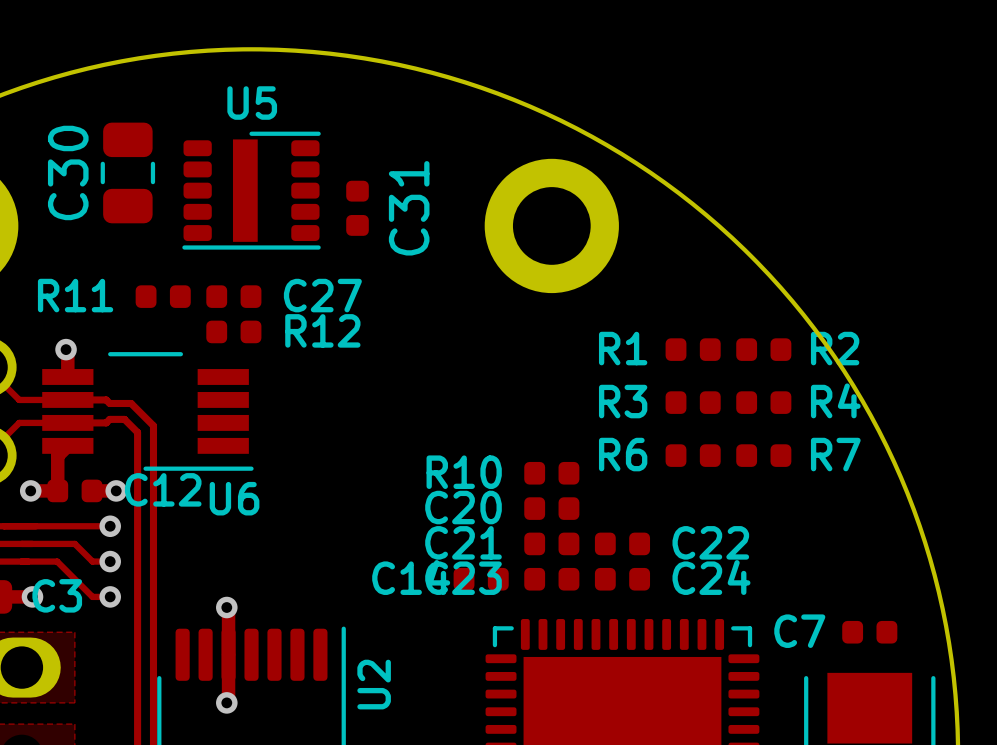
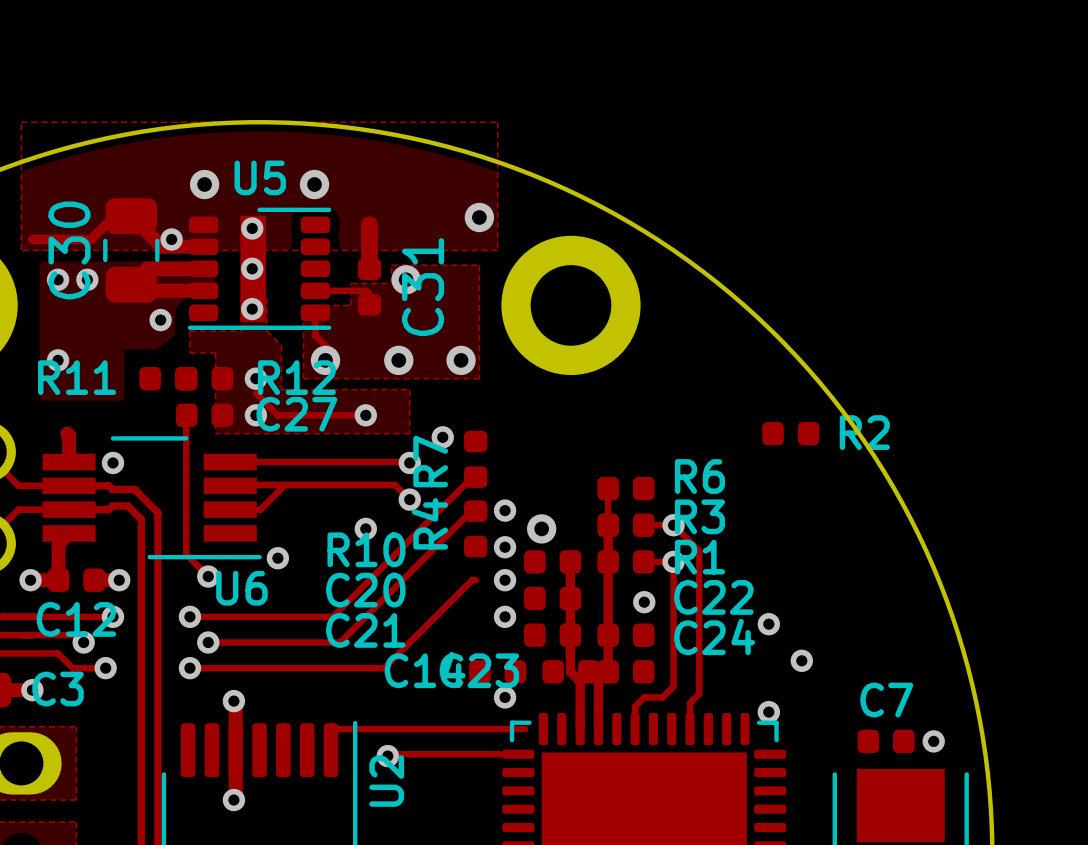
zone outline: none -> (21, 122) (21, 250) (497, 250) (497, 122) (21, 122)
via: none -> (204, 184)
via: none -> (314, 184)
via: none -> (479, 217)
track: none -> (369, 224) (369, 258)
via: none -> (252, 228)
track: none -> (32, 239) (91, 239) (114, 216) (131, 216) (162, 246) (203, 246)
via: none -> (171, 239)
zone outline: none -> (391, 265) (391, 283) (351, 283) (351, 305) (303, 305) (303, 378) (479, 378) (479, 265) (391, 265)
track: none -> (203, 268) (147, 268) (131, 284) (137, 290) (203, 290)
via: none -> (252, 268)
via: none -> (58, 279)
via: none -> (87, 279)
via: none -> (406, 279)
track: none -> (315, 290) (366, 290) (369, 293)
zone outline: none -> (241, 298) (241, 331) (189, 331) (189, 353) (215, 353) (215, 433) (409, 433) (409, 389) (281, 389) (281, 345) (266, 331) (266, 298) (241, 298)
via: none -> (252, 309)
track: none -> (315, 312) (315, 335) (329, 349)
via: none -> (160, 320)
via: none -> (58, 360)
via: none -> (325, 360)
via: none -> (398, 360)
via: none -> (461, 360)
C27 position: (233, 296) -> (204, 415)
via: none -> (255, 378)
track: none -> (255, 393) (277, 415) (365, 415)
track: none -> (186, 415) (186, 554) (208, 576)
R12 position: (233, 331) -> (204, 378)
via: none -> (255, 415)
via: none -> (365, 415)
R1 name position: R1 (623, 348) -> R1 (699, 557)
via: (66, 349) -> none
R1 position: (693, 349) -> (625, 561)
via: none -> (442, 437)
track: none -> (230, 462) (409, 462)
via: none -> (113, 462)
via: none -> (409, 462)
track: none -> (475, 477) (472, 477) (332, 616) (189, 616)
track: none -> (230, 485) (395, 484) (409, 499)
track: none -> (285, 484) (260, 509) (230, 509)
R4 name position: R4 (835, 400) -> R4 (429, 523)
R3 name position: R3 (623, 401) -> R3 (699, 516)
track: none -> (608, 488) (608, 671) (598, 681) (598, 729)
R3 position: (693, 402) -> (625, 525)
R4 rotation: 0° (763, 402) -> 90° clockwise (475, 528)
R4 position: (763, 402) -> (475, 528)
via: none -> (409, 499)
track: none -> (475, 510) (472, 510) (340, 642) (208, 642)
via: none -> (505, 510)
track: none -> (643, 525) (673, 525) (699, 550) (699, 693) (690, 702) (690, 729)
via: none -> (673, 525)
via: none -> (365, 528)
via: none -> (541, 528)
R6 name position: R6 (623, 454) -> R6 (699, 476)
R7 name position: R7 (835, 454) -> R7 (430, 461)
R6 position: (693, 455) -> (625, 488)
R7 rotation: 0° (763, 455) -> 90° clockwise (475, 459)
R7 position: (763, 455) -> (475, 459)
via: none -> (505, 547)
via: none -> (277, 558)
R10 name position: R10 (464, 472) -> R10 (366, 549)
track: none -> (570, 561) (570, 671) (580, 681) (580, 729)
R10 position: (551, 473) -> (552, 561)
track: none -> (643, 561) (673, 561) (673, 686) (662, 697) (644, 697) (635, 706) (635, 729)
via: none -> (673, 561)
via: none -> (208, 576)
C12 name position: C12 (163, 489) -> C12 (76, 619)
track: none -> (475, 580) (472, 580) (384, 668) (189, 668)
via: none -> (505, 580)
C20 name position: C20 (463, 507) -> C20 (365, 590)
C20 position: (551, 508) -> (552, 598)
via: none -> (644, 602)
via: none -> (189, 616)
via: none -> (505, 616)
via: none -> (768, 624)
C21 name position: C21 (463, 542) -> C21 (365, 630)
C22 name position: C22 (710, 542) -> C22 (713, 597)
C21 position: (551, 543) -> (552, 635)
C22 position: (622, 543) -> (625, 635)
track: (81, 550) (92, 561) (110, 561) -> none
via: none -> (83, 642)
via: none -> (208, 642)
via: (110, 561) -> none
via: none -> (801, 660)
track: (71, 575) (92, 596) (110, 596) -> (72, 668) (105, 668)
via: none -> (105, 668)
via: none -> (189, 668)
C24 name position: C24 (711, 577) -> C24 (714, 637)
C24 position: (622, 579) -> (625, 671)
via: (110, 596) -> none
via: none -> (505, 697)
via: none -> (768, 712)
C7 name position: C7 (799, 631) -> C7 (886, 700)
C7 position: (869, 632) -> (886, 741)
track: none -> (525, 729) (334, 729) (331, 732) (331, 750)
via: none -> (933, 741)
track: none -> (500, 754) (389, 754) (387, 756)
via: none -> (387, 756)

